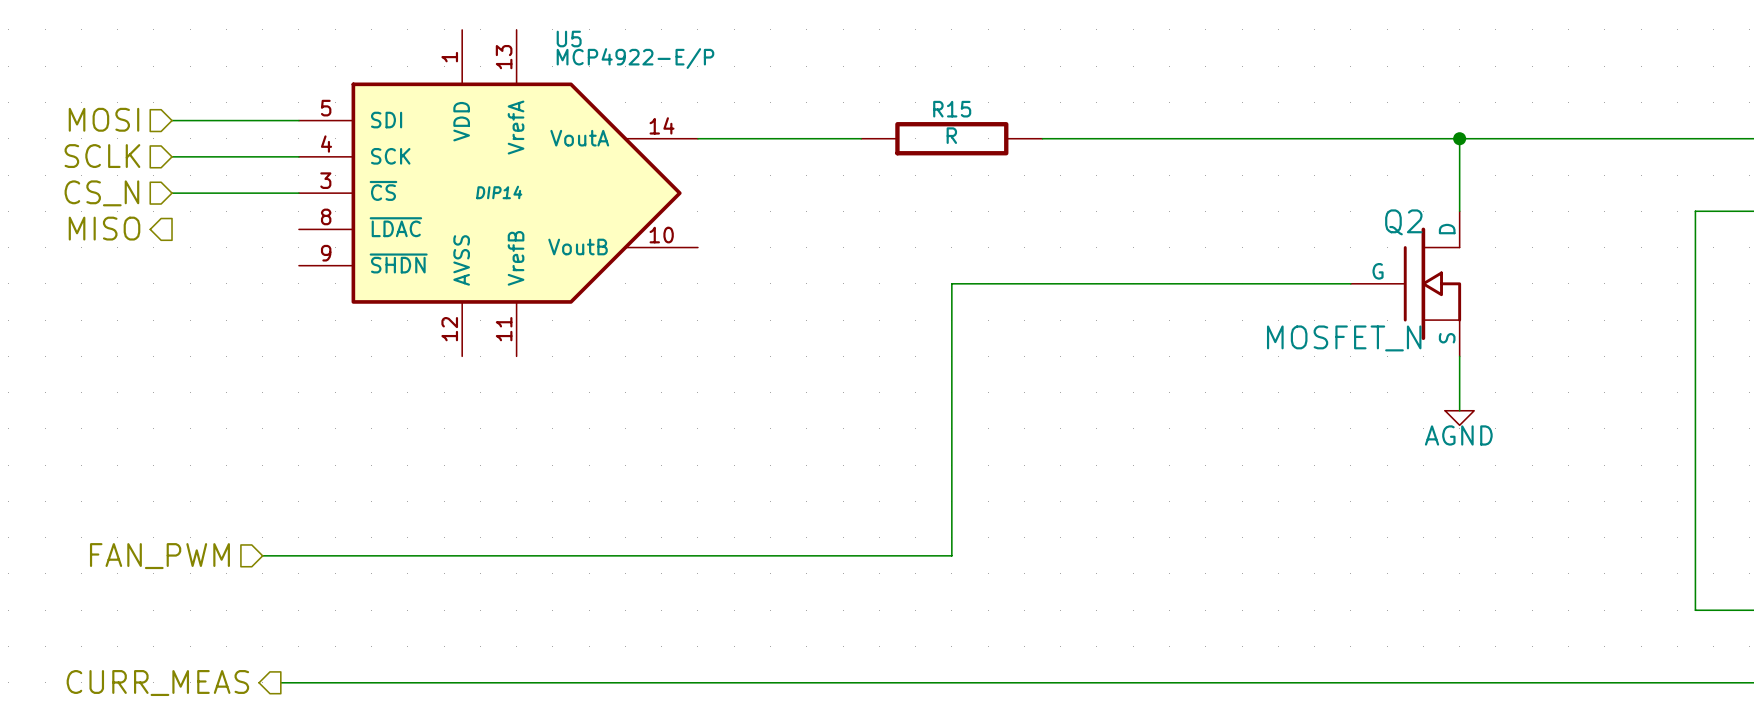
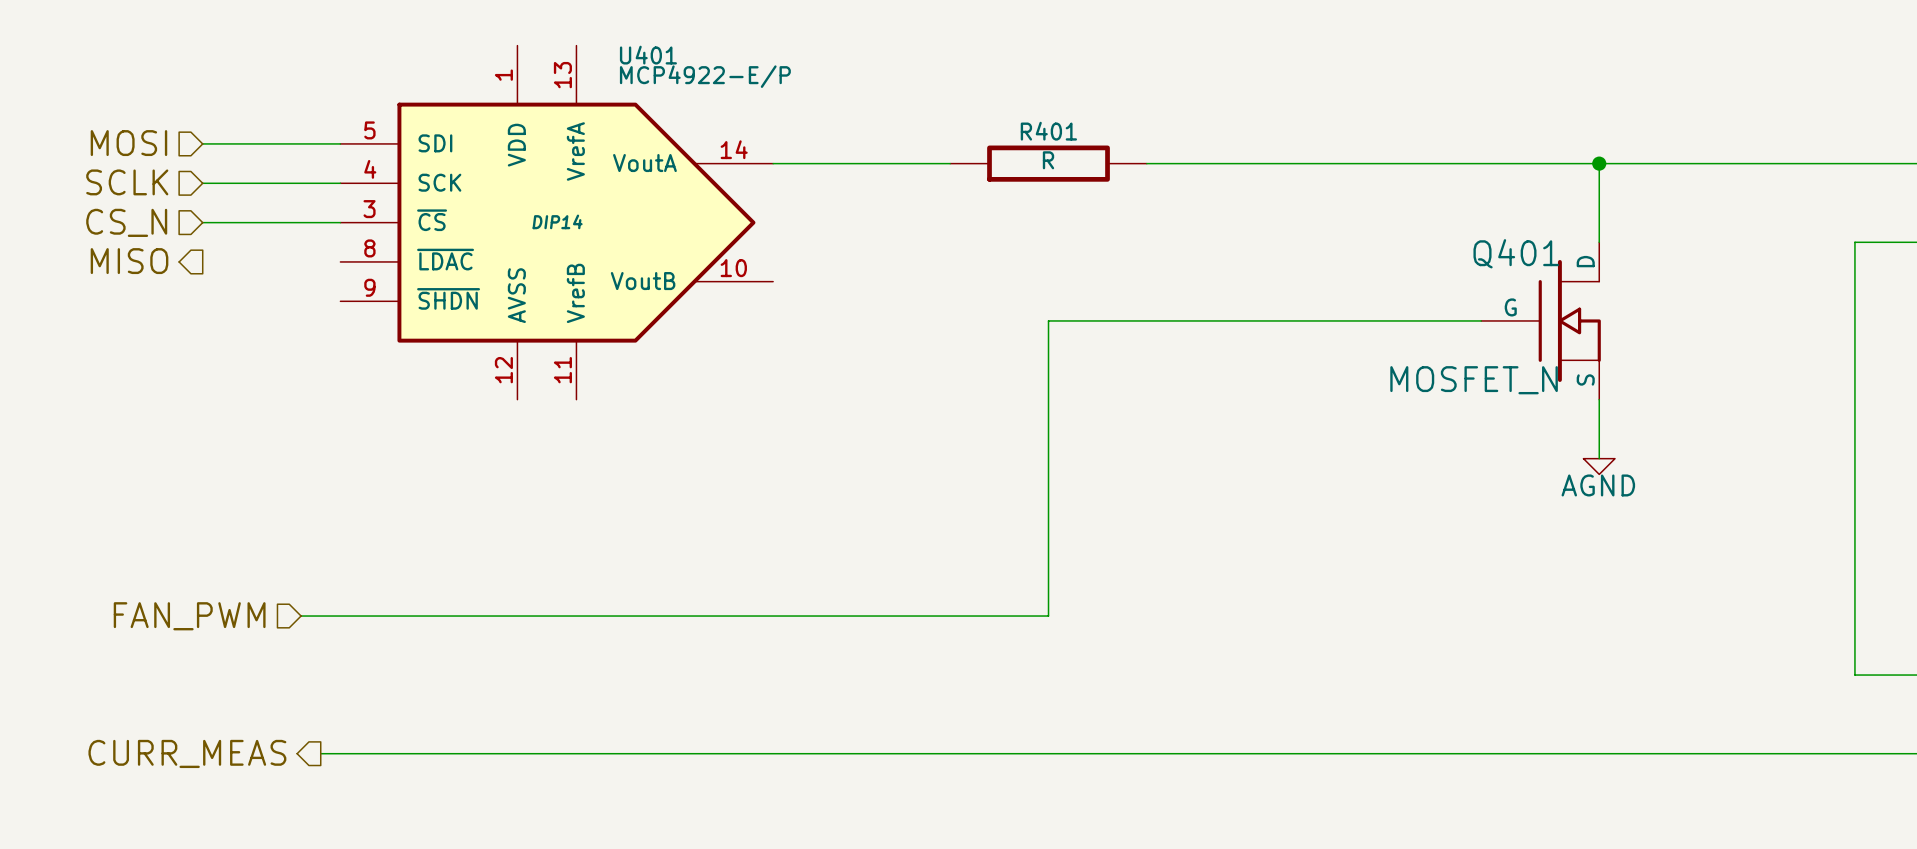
U5 name: U5 (569, 39) -> U401 (648, 55)
R15 name: R15 (952, 109) -> R401 (1048, 131)
Q2 name: Q2 (1403, 222) -> Q401 (1516, 253)

